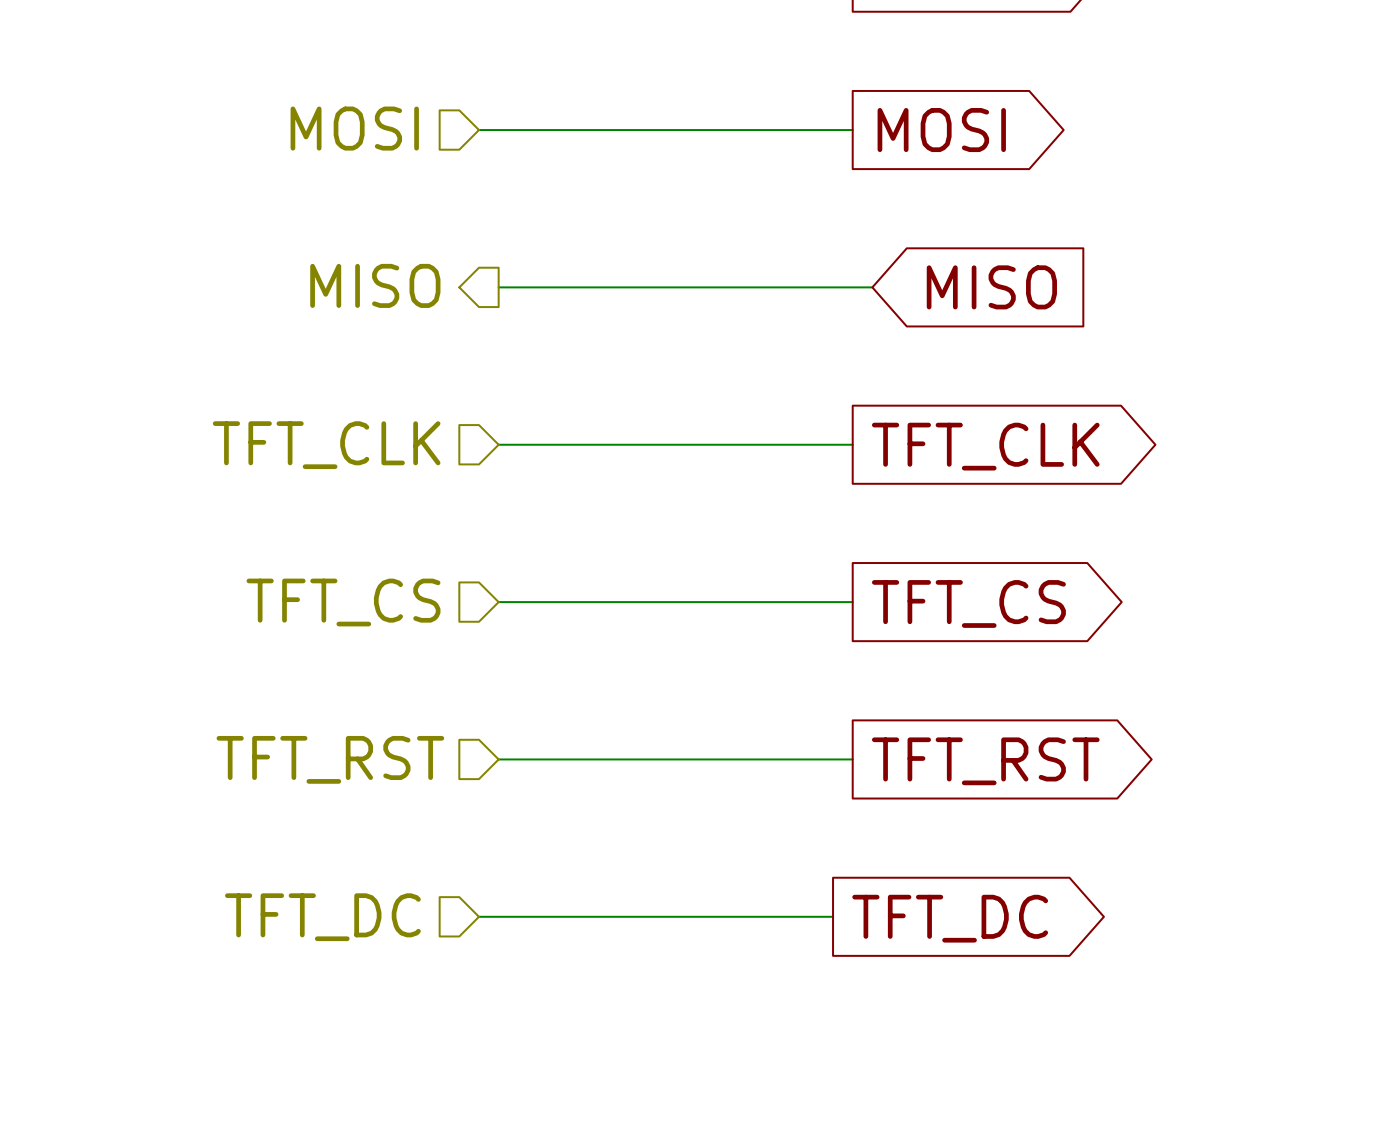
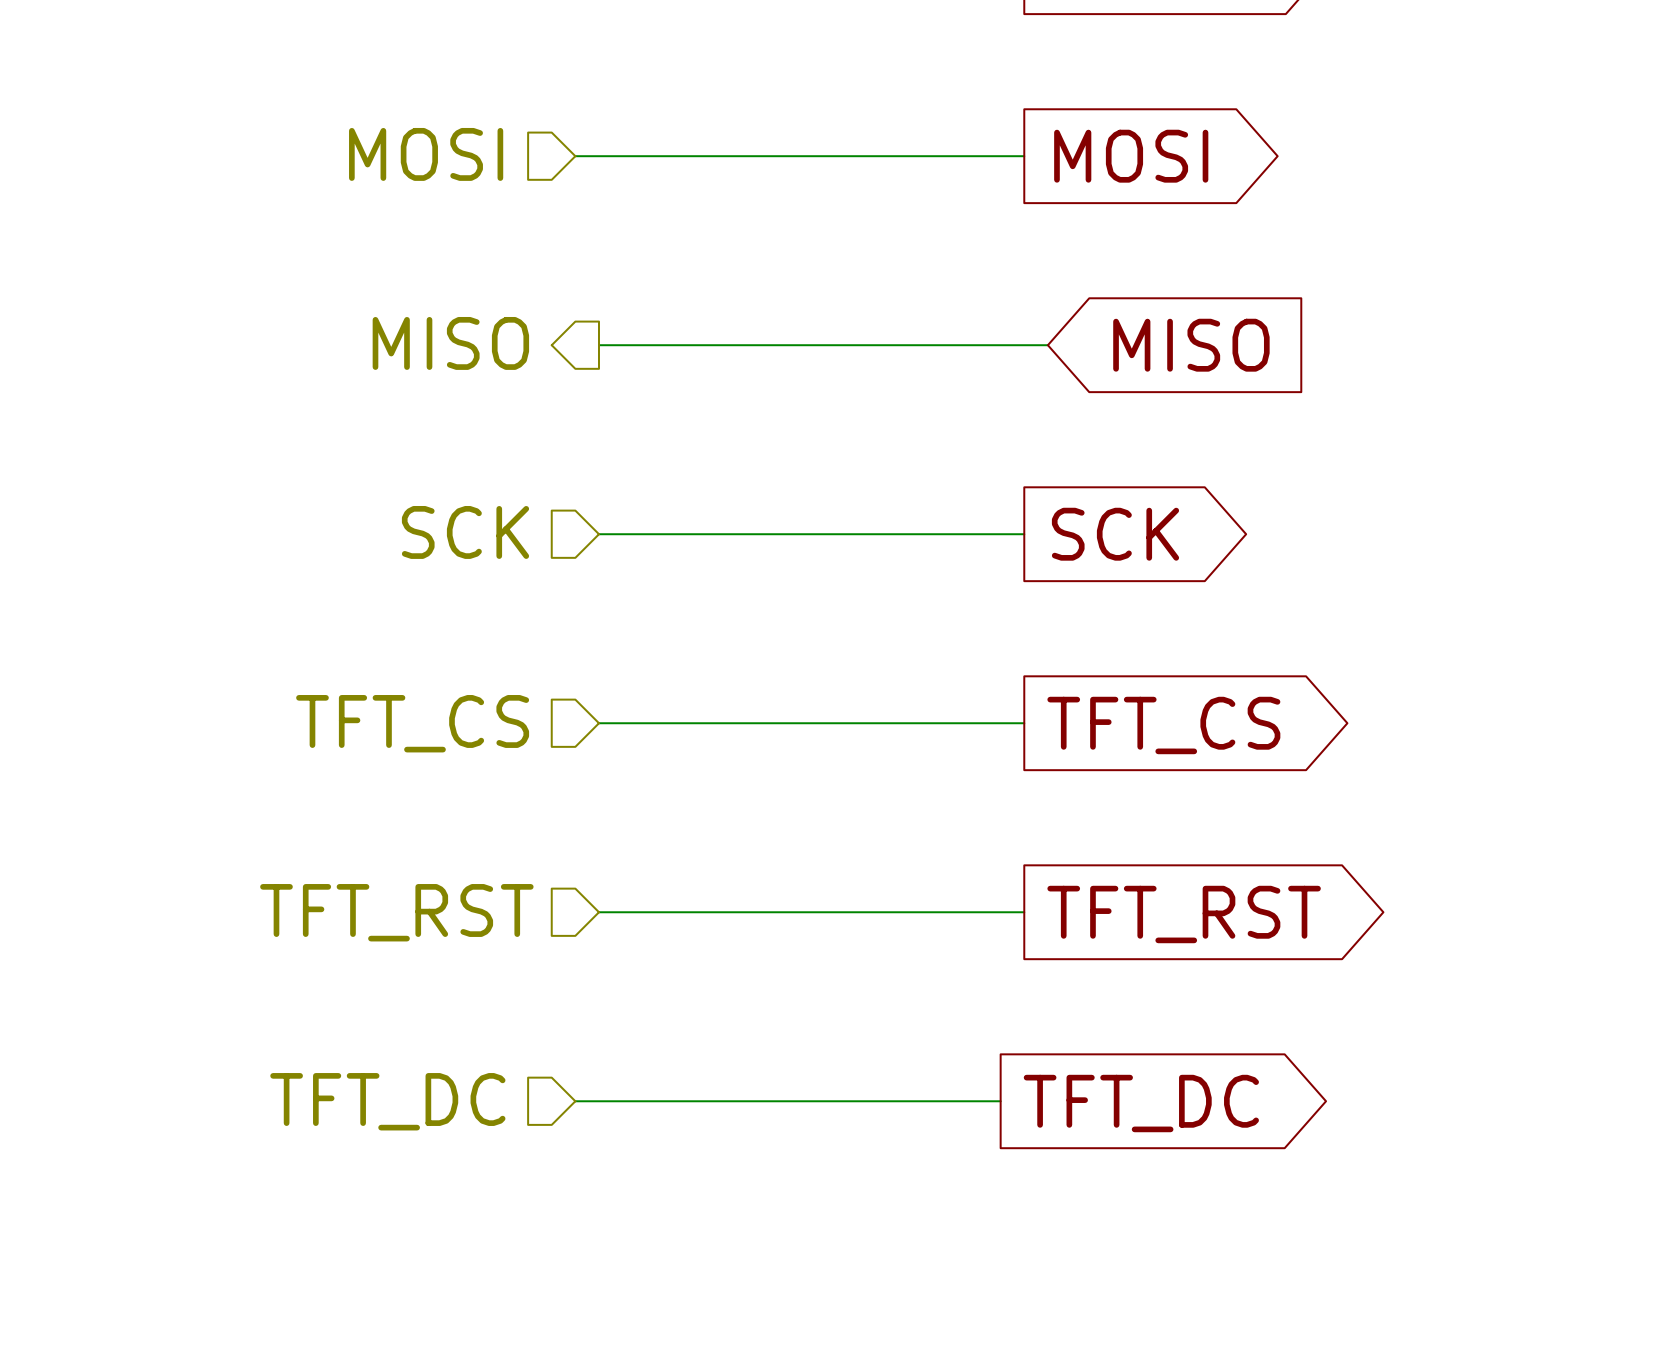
hierarchical label: TFT_CLK (326, 445) -> SCK (465, 532)
global label: TFT_CLK (985, 446) -> SCK (1115, 534)

